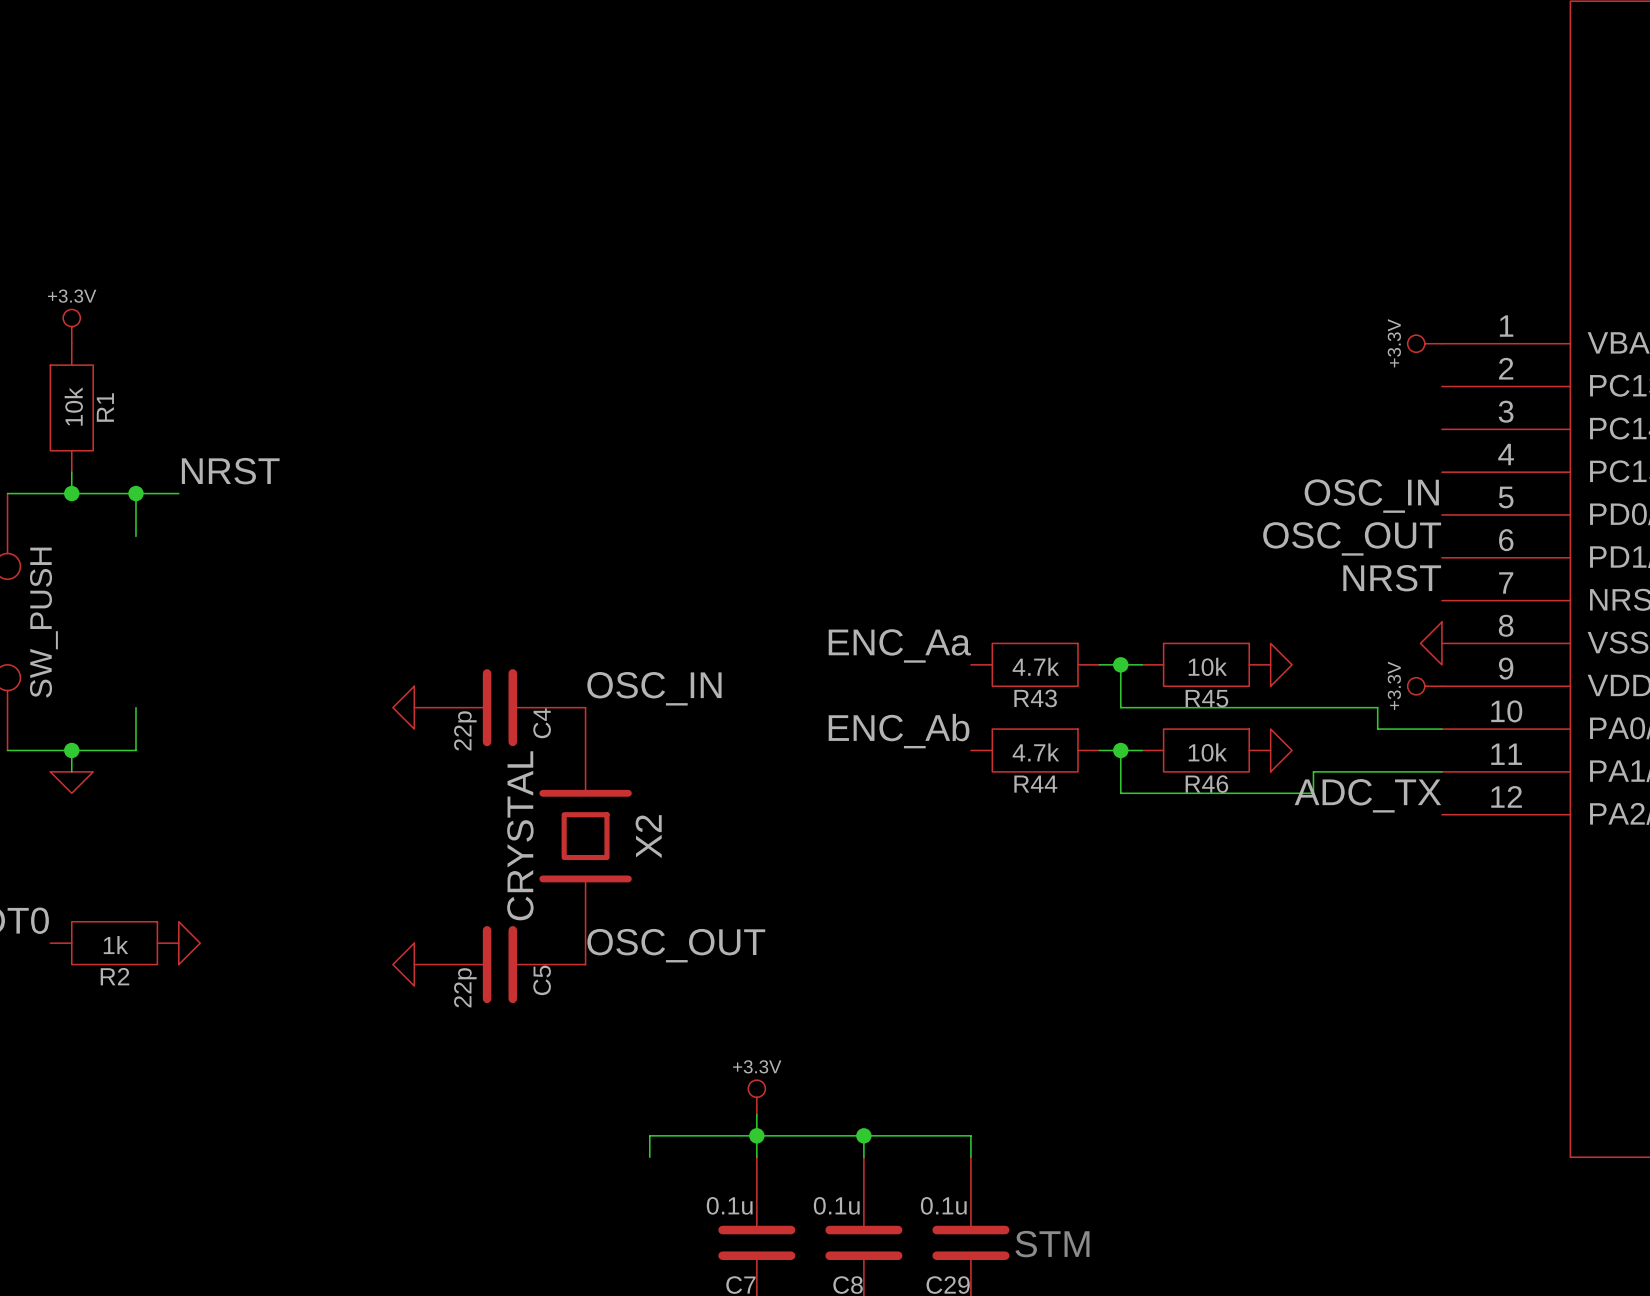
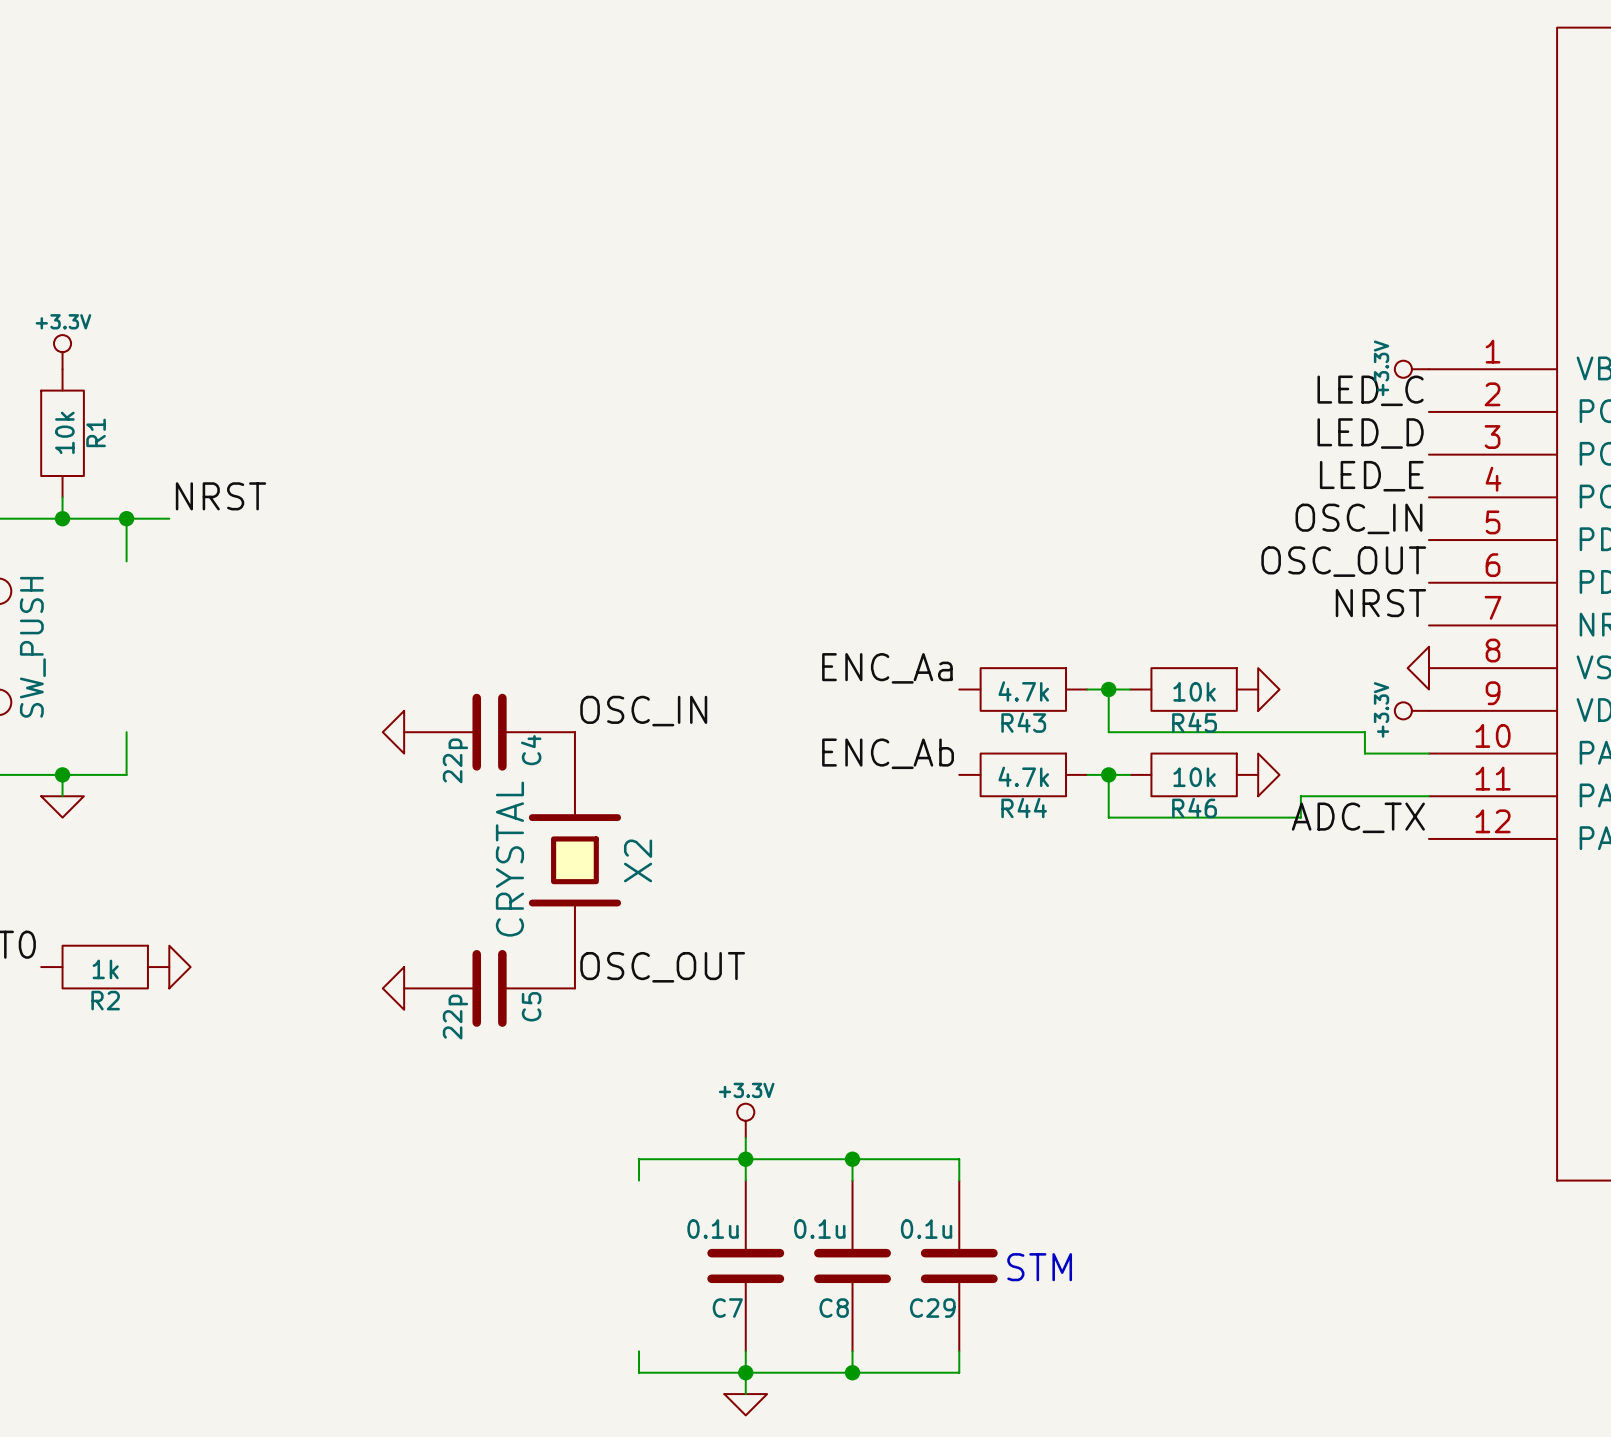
label: none -> LED_C (1370, 390)
label: none -> LED_D (1370, 433)
label: none -> LED_E (1371, 476)

